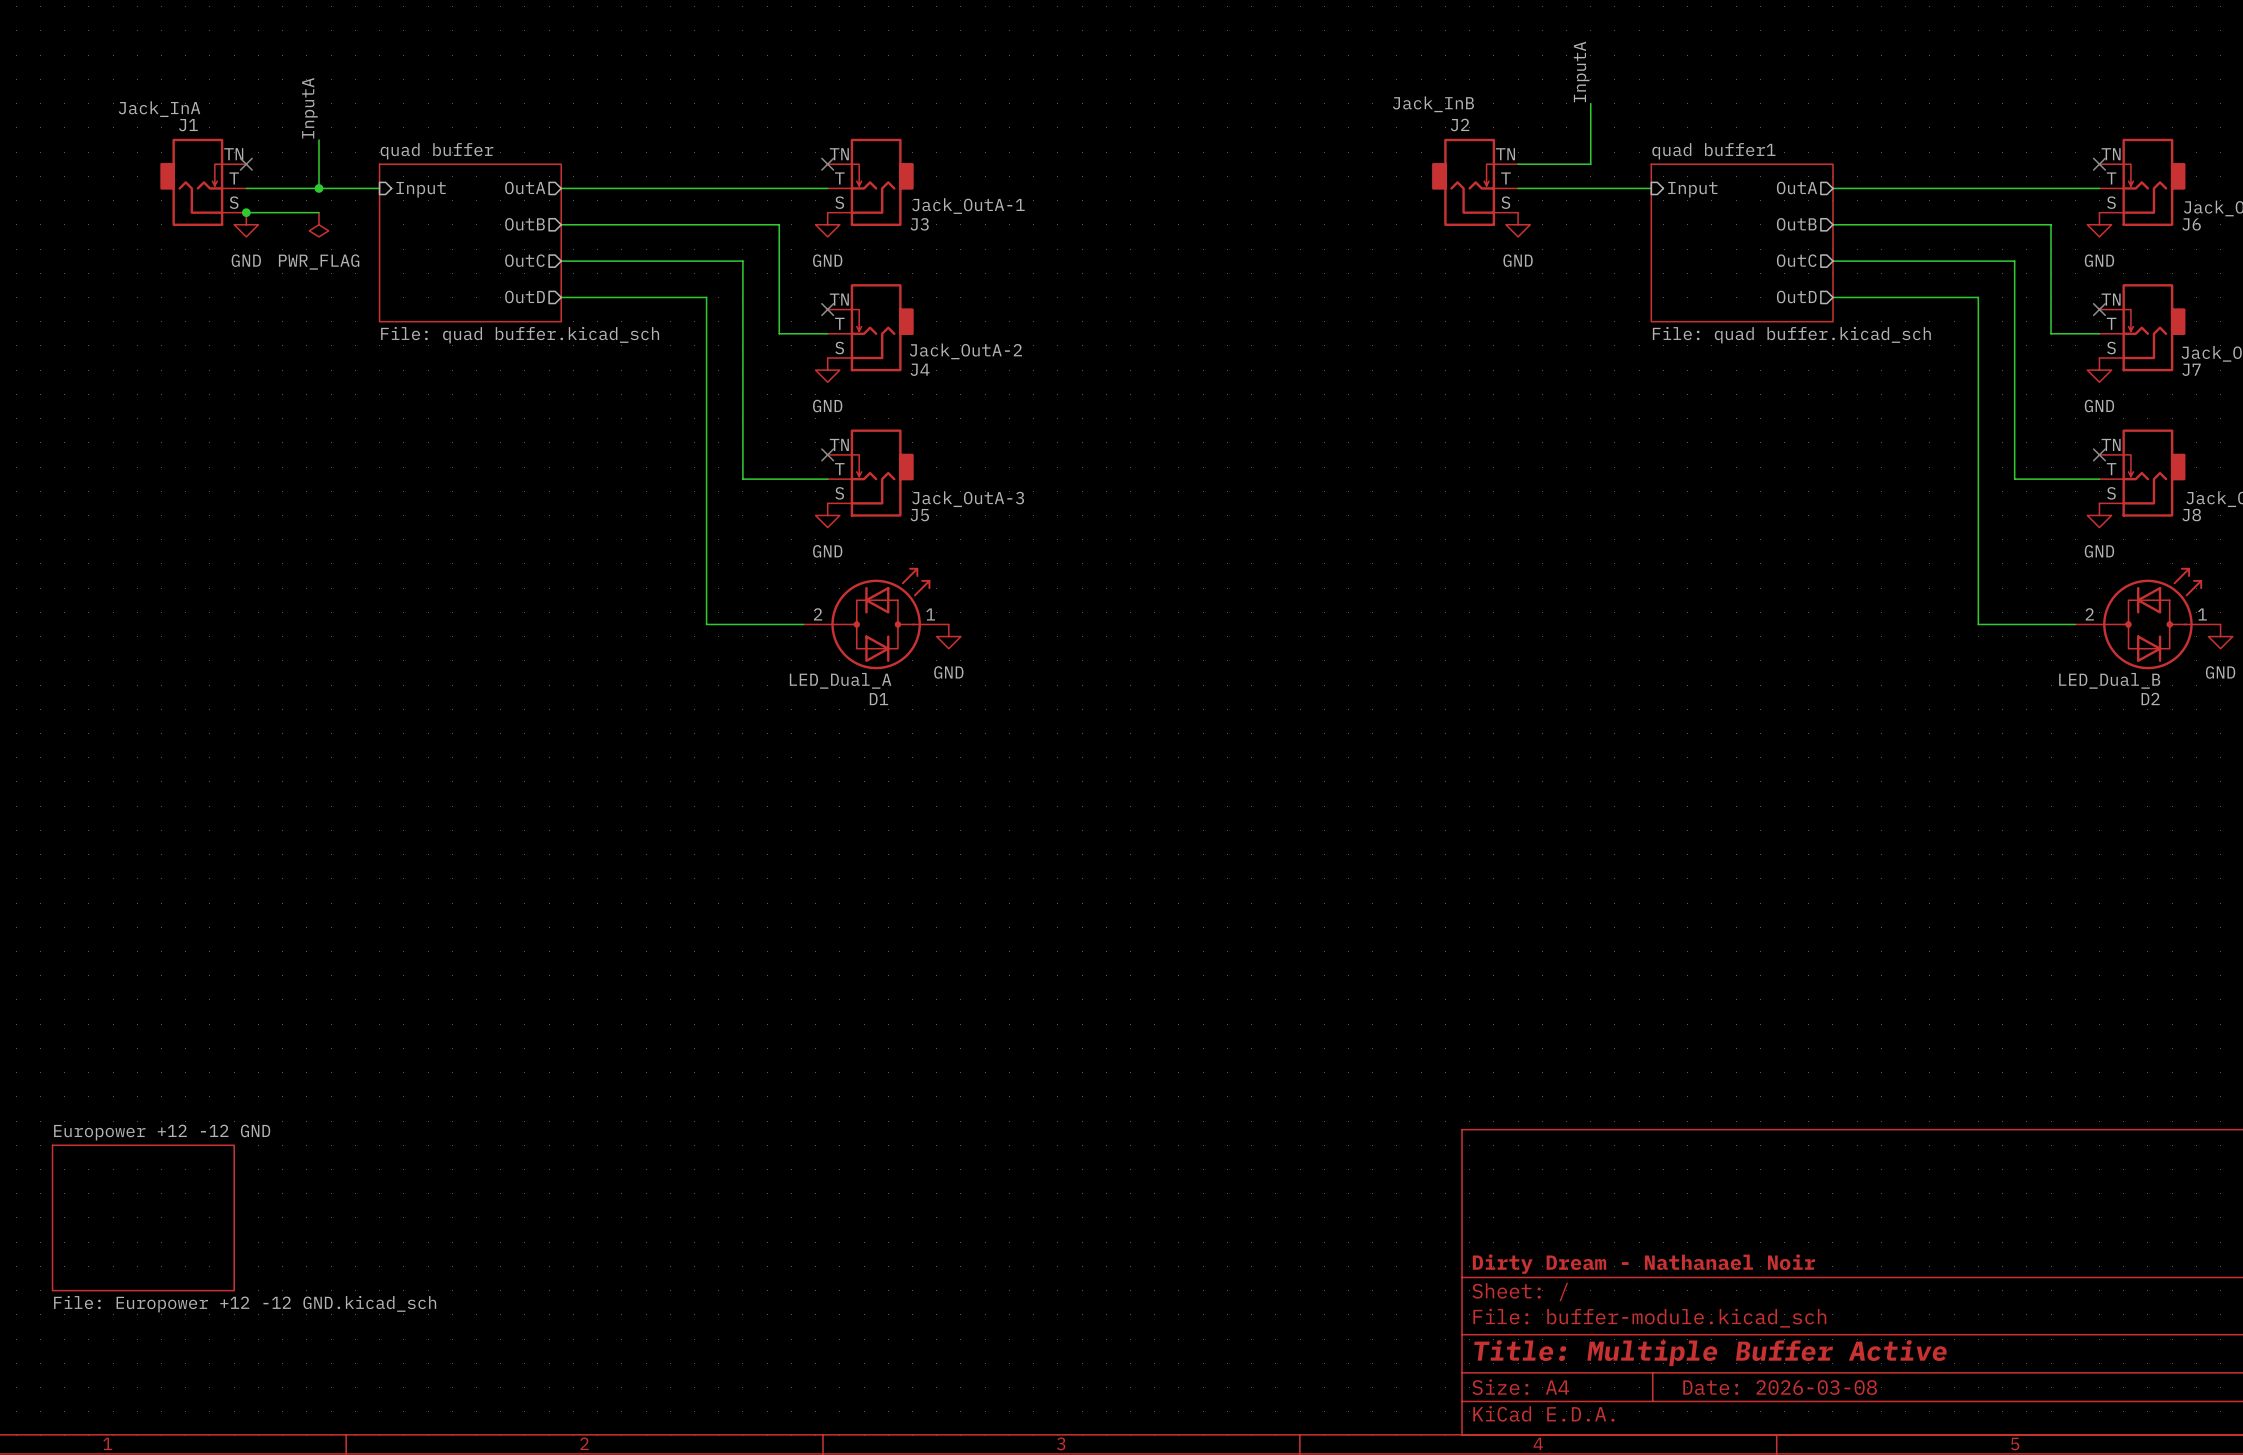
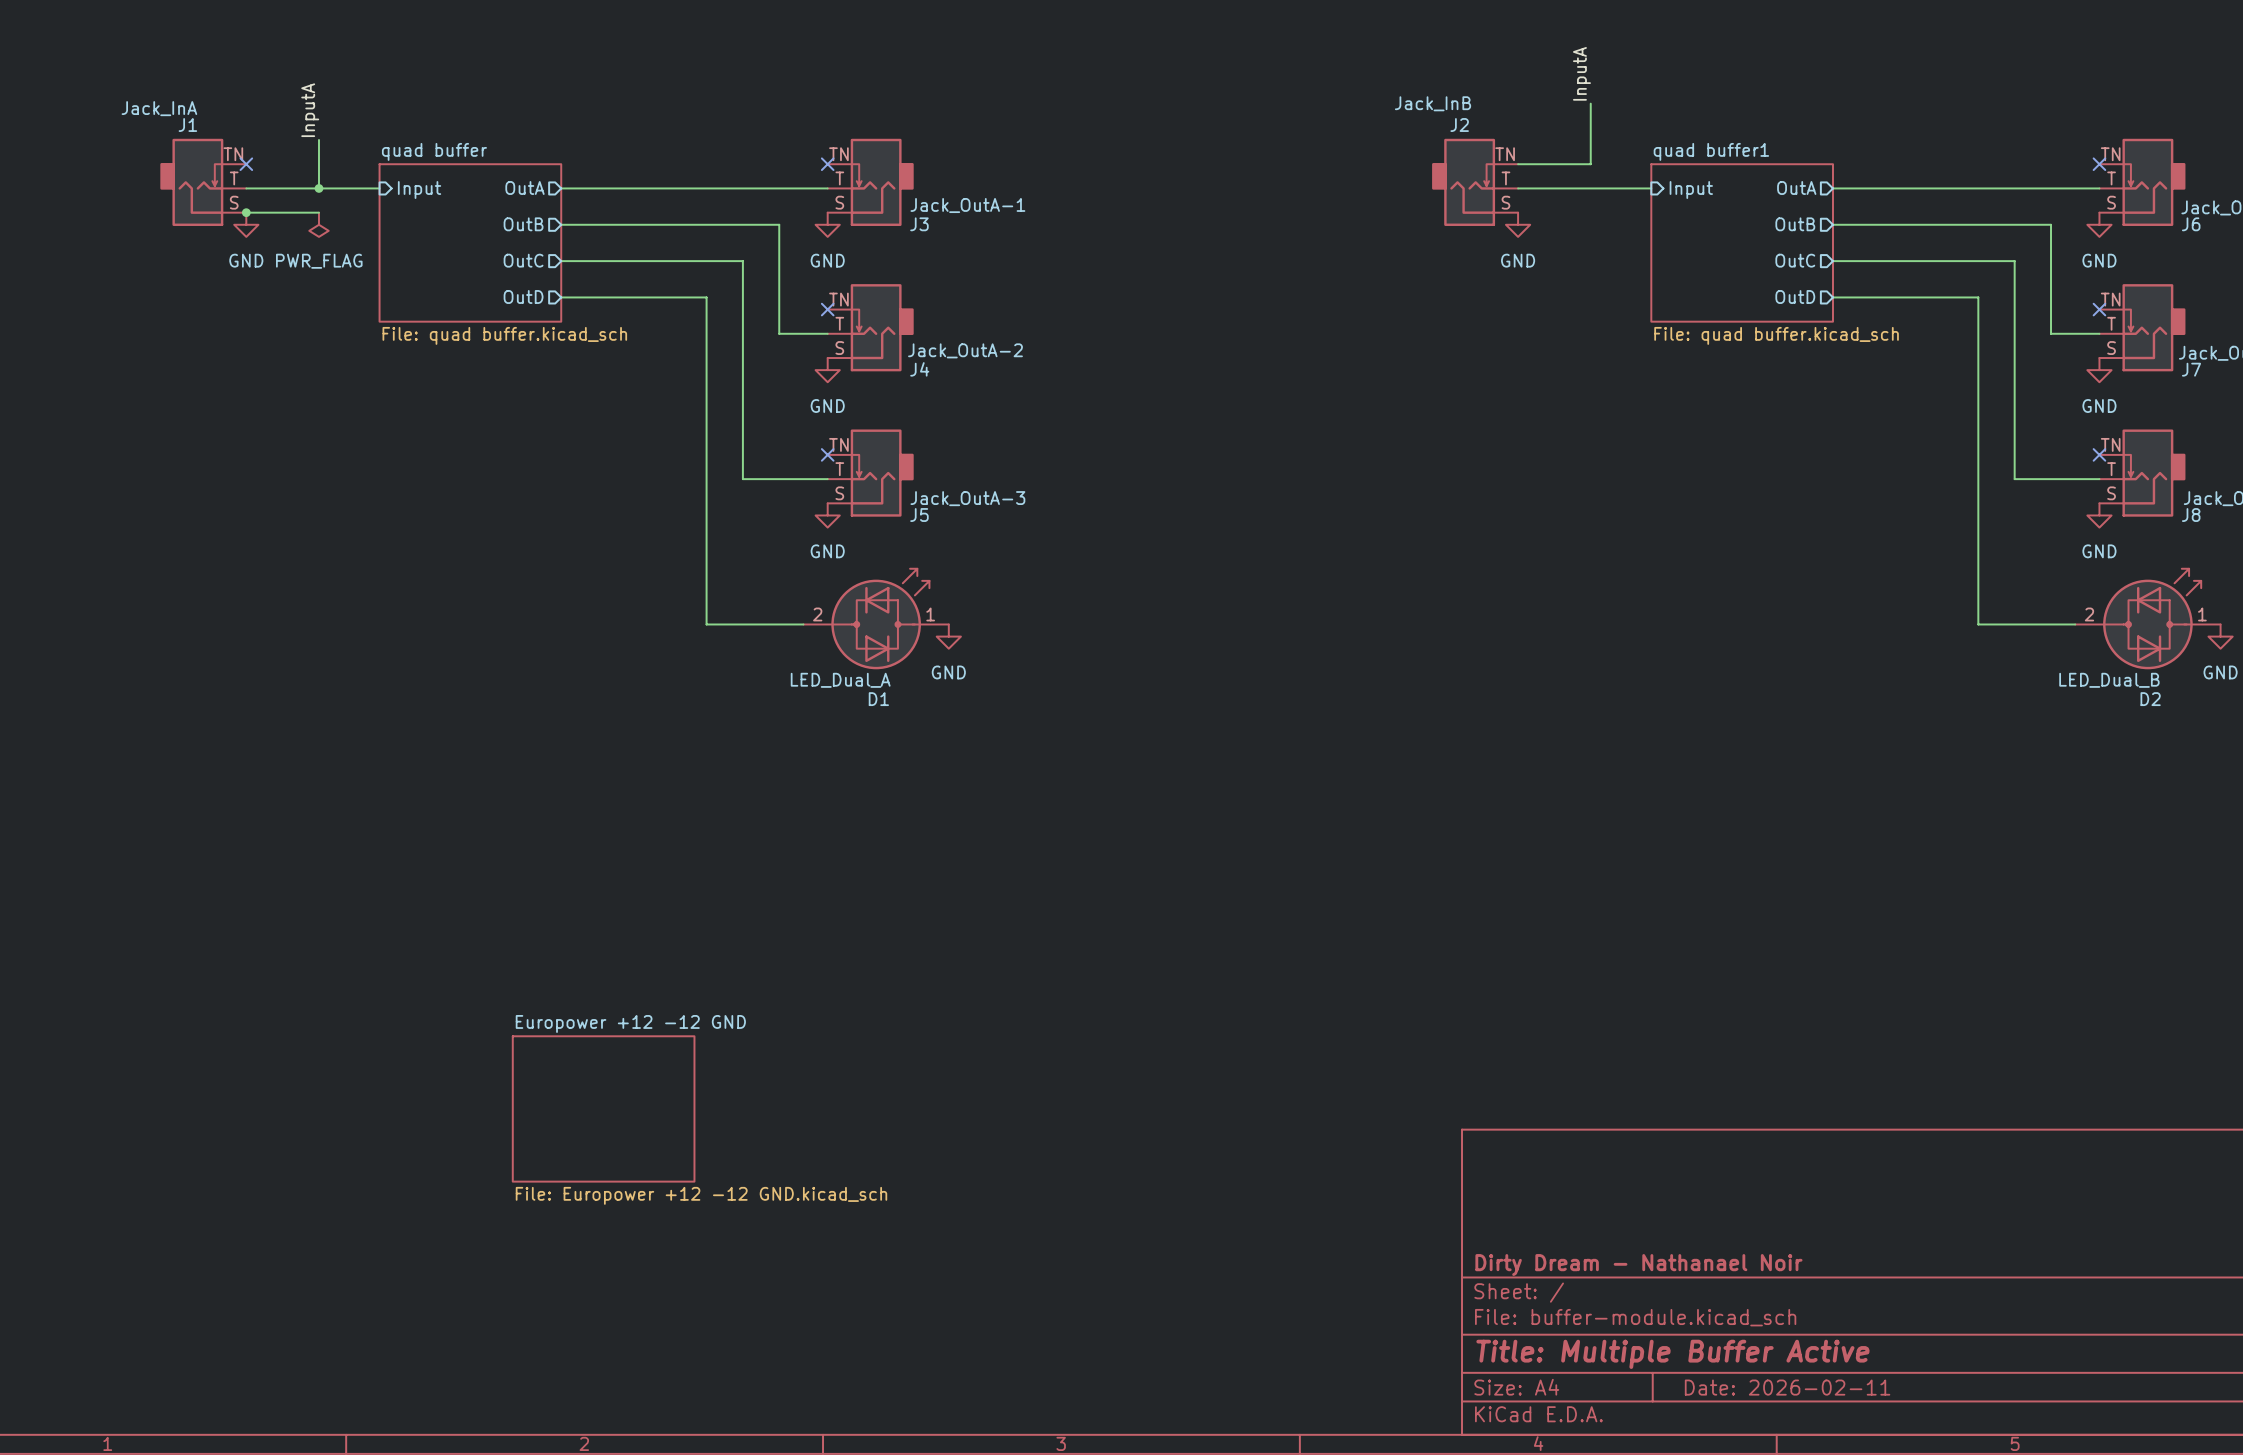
sheet Europower +12 -12 GND position: (143, 1217) -> (603, 1108)
title block: Date: 2026-03-08 (1780, 1387) -> Date: 2026-02-11 (1787, 1387)

